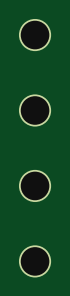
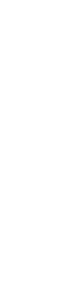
part: (35, 35) -> none
part: (35, 110) -> none
part: (35, 185) -> none
part: (35, 261) -> none

